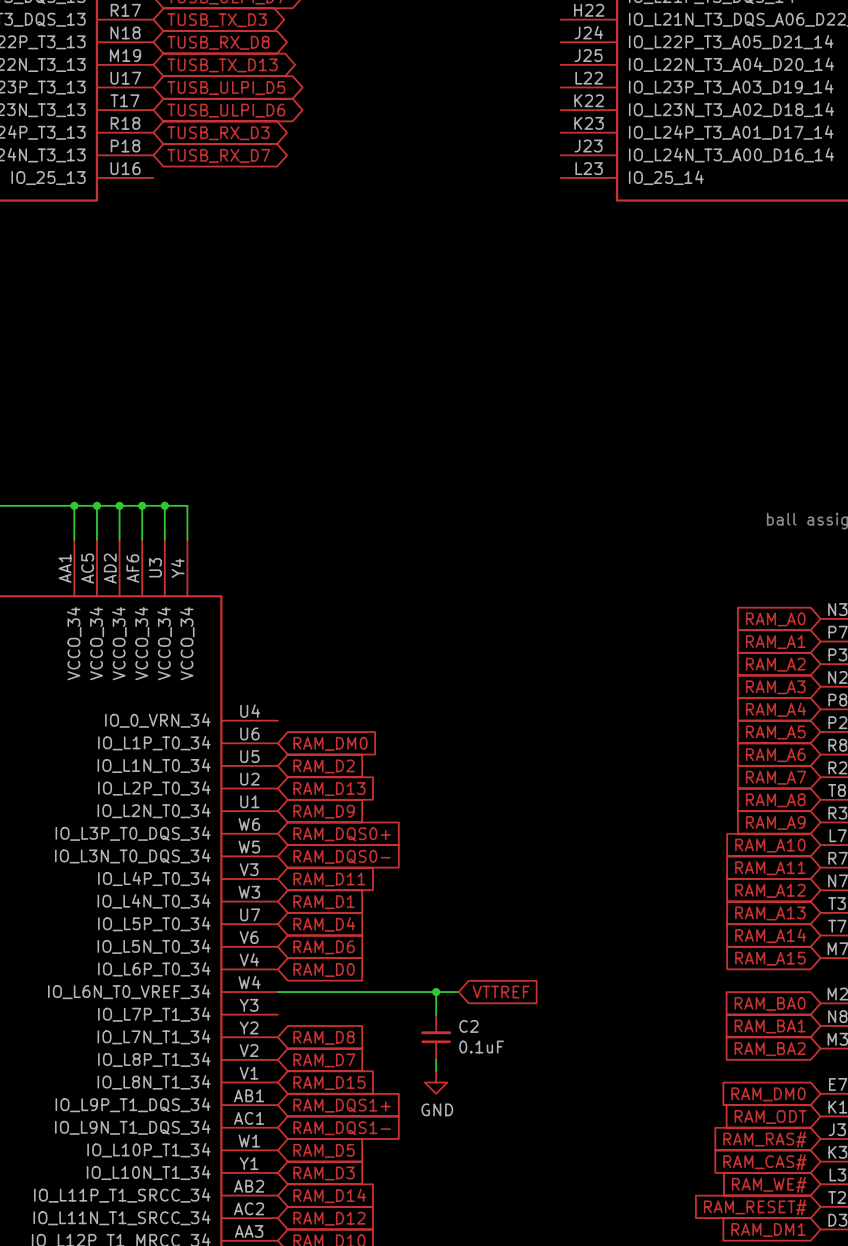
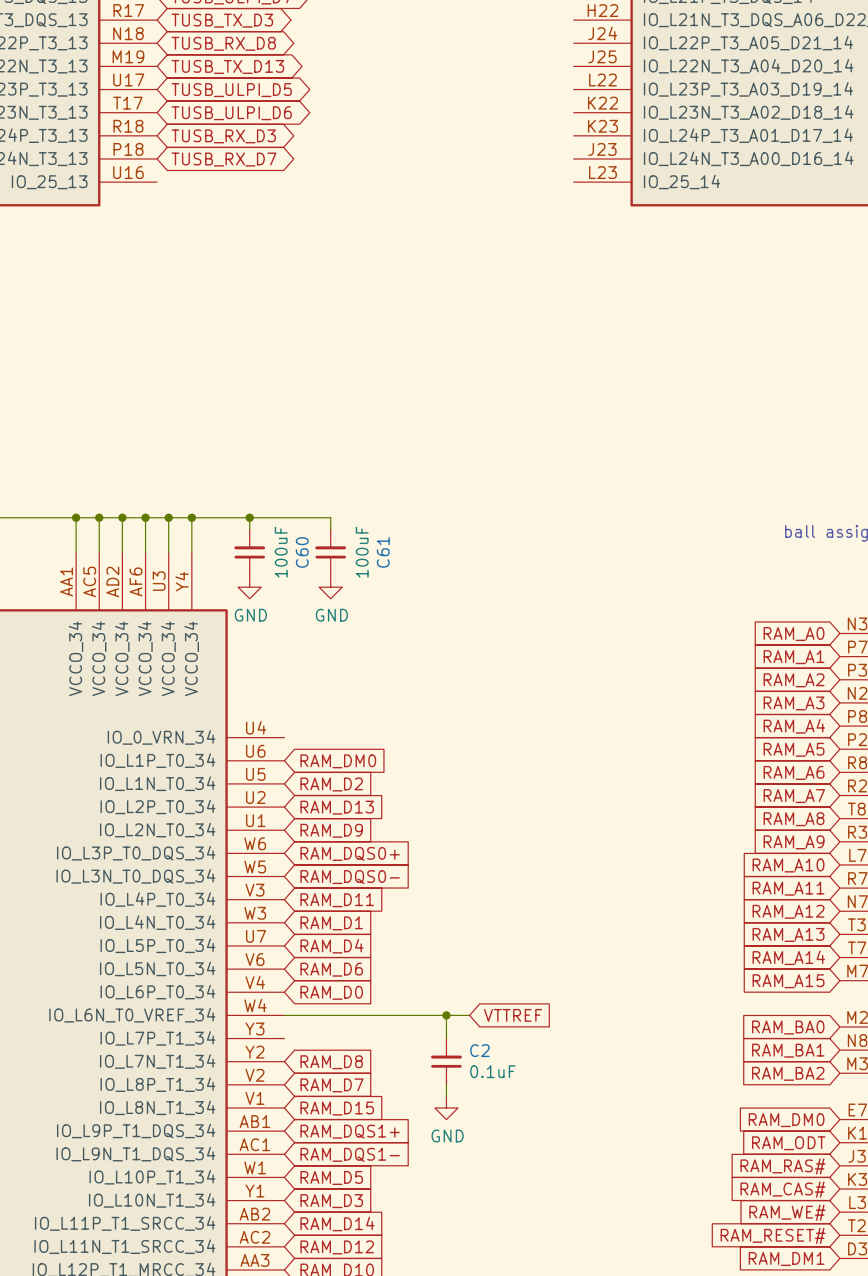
wire: none -> (191, 517) (330, 517) (330, 529)
junction: none -> (191, 517)
wire: none -> (249, 517) (249, 529)
junction: none -> (249, 517)
C60: none -> 100uF (249, 552)
C61: none -> 100uF (330, 552)
power symbol: none -> GND (249, 587)
power symbol: none -> GND (330, 587)

